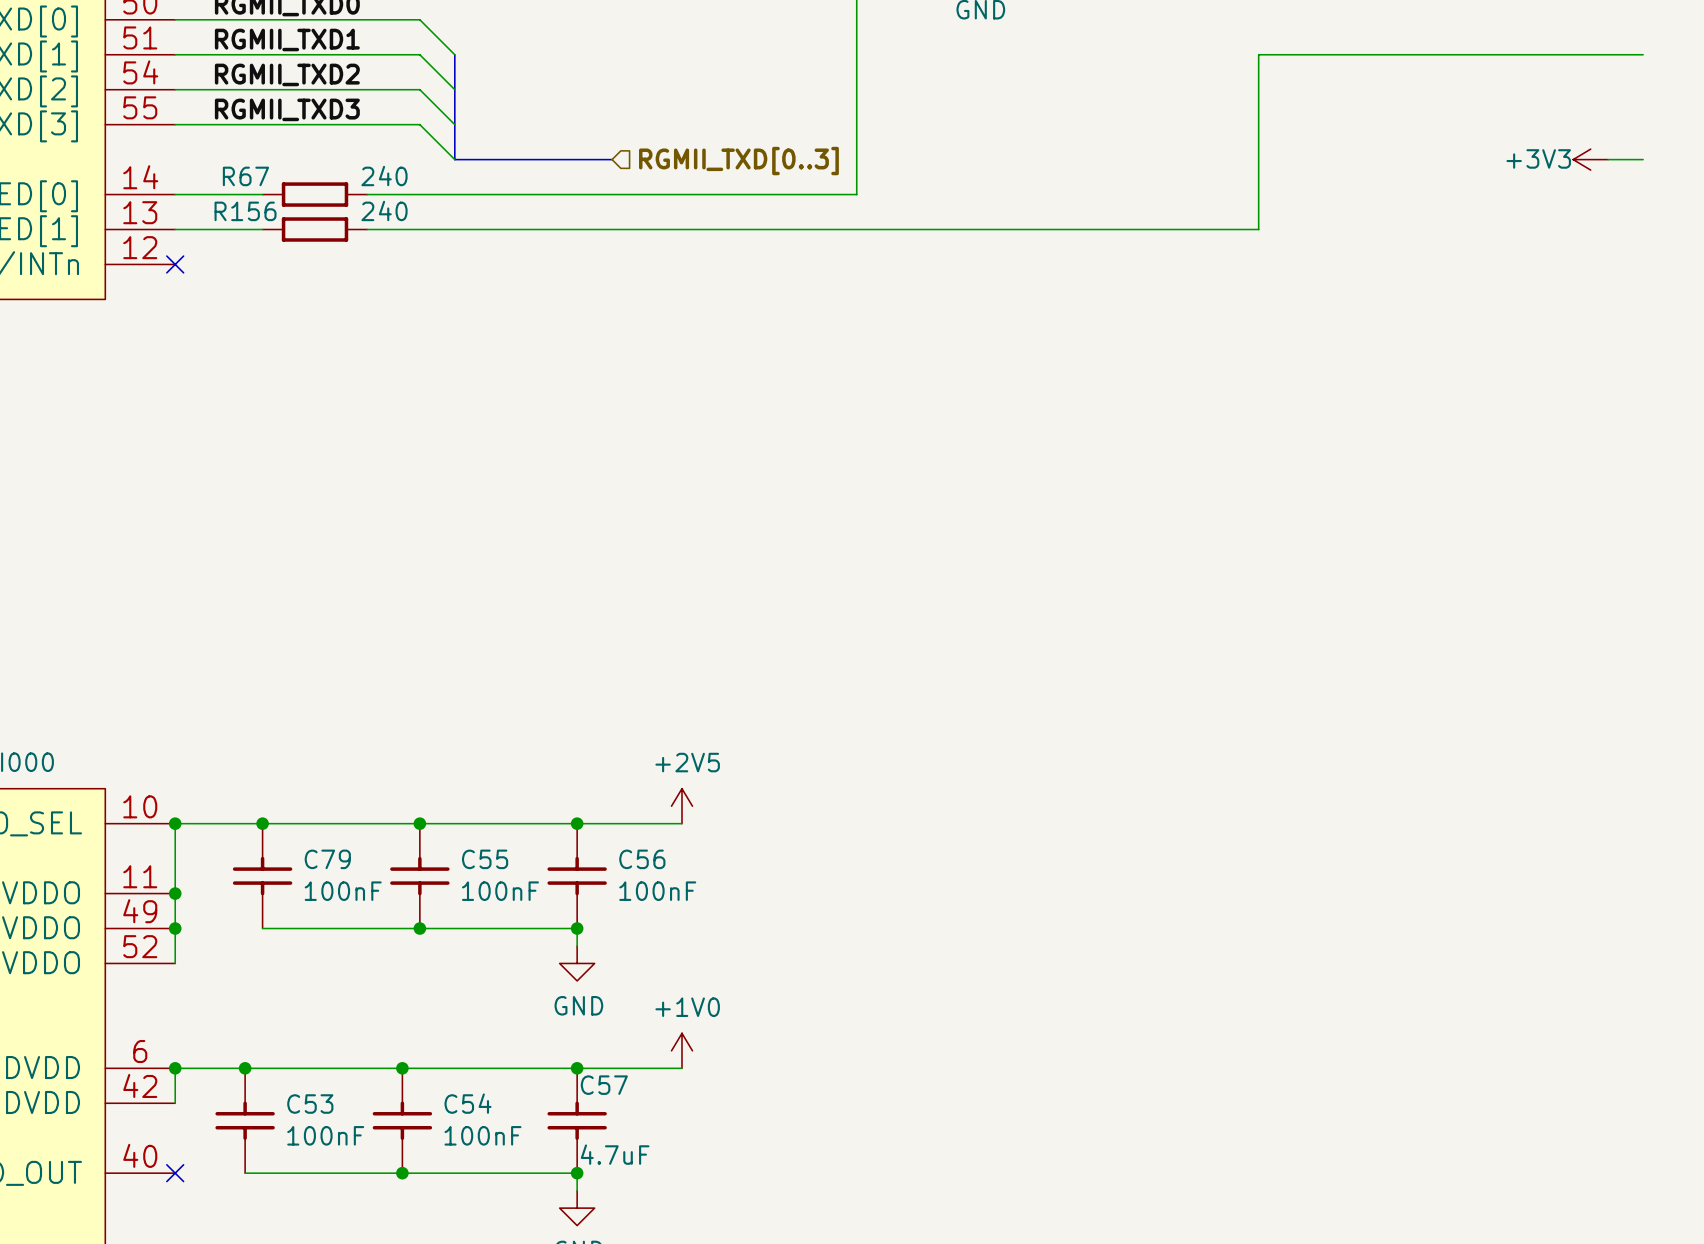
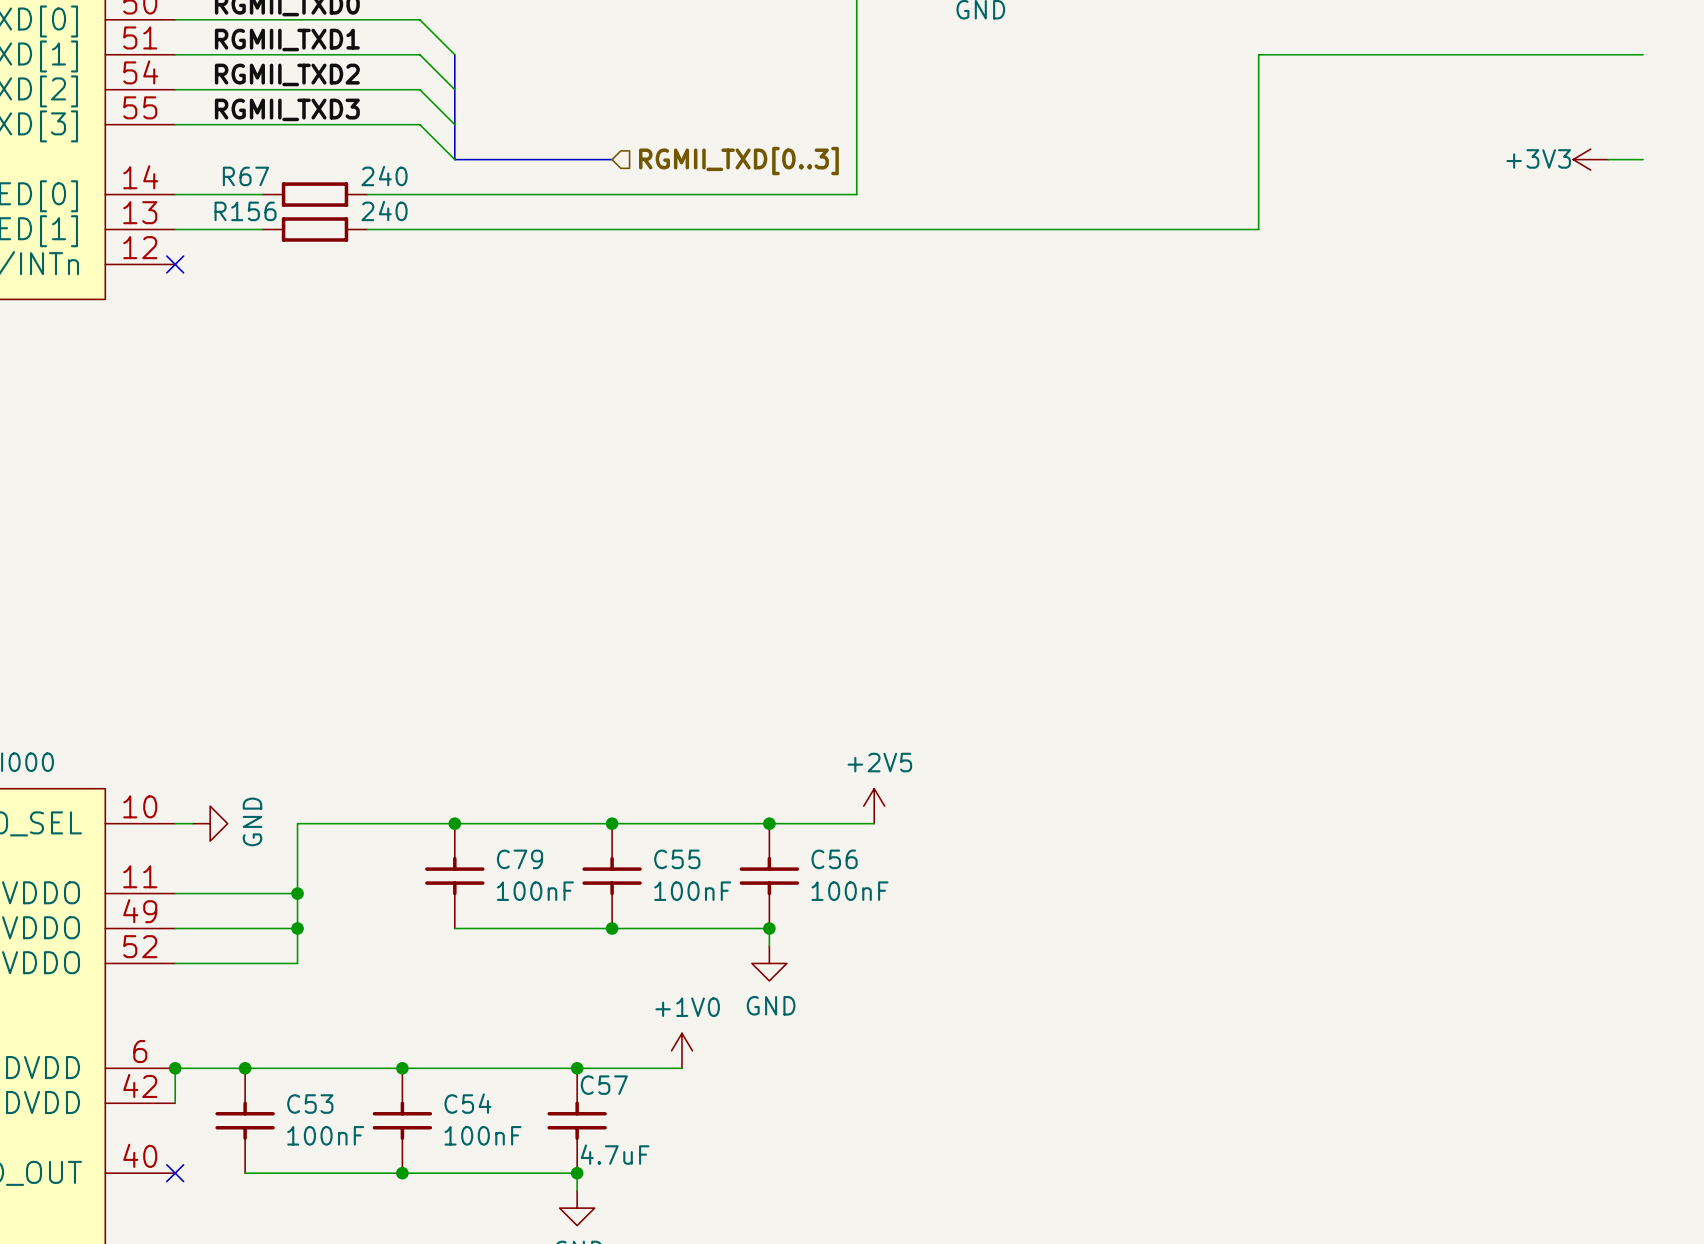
power symbol position: +2V5 (681, 806) -> +2V5 (874, 806)
wire: (175, 823) (175, 963) -> (297, 823) (297, 963) (175, 963)
junction: (175, 823) -> none
wire: (192, 823) (297, 823) -> none
power symbol: none -> GND (210, 823)
junction: (262, 823) -> none
junction position: (419, 823) -> (454, 823)
junction position: (577, 823) -> (612, 823)
wire: none -> (681, 823) (874, 823)
junction: none -> (769, 823)
C79 position: (262, 876) -> (454, 876)
C55 position: (419, 876) -> (612, 876)
C56 position: (577, 876) -> (769, 876)
wire: none -> (175, 893) (297, 893)
junction: (175, 893) -> none
junction: none -> (297, 893)
wire: none -> (175, 928) (262, 928)
junction: (175, 928) -> none
wire: (297, 928) (454, 928) -> none
junction: none -> (297, 928)
junction: (419, 928) -> none
wire: (577, 928) (577, 945) -> (577, 928) (769, 928) (769, 945)
junction position: (577, 928) -> (612, 928)
junction: none -> (769, 928)
power symbol position: GND (577, 963) -> GND (769, 963)

